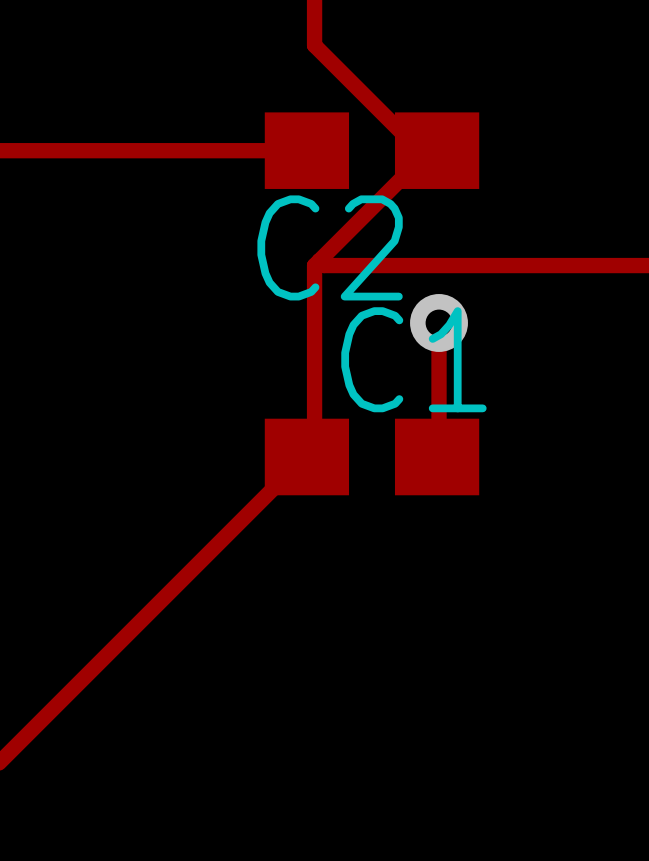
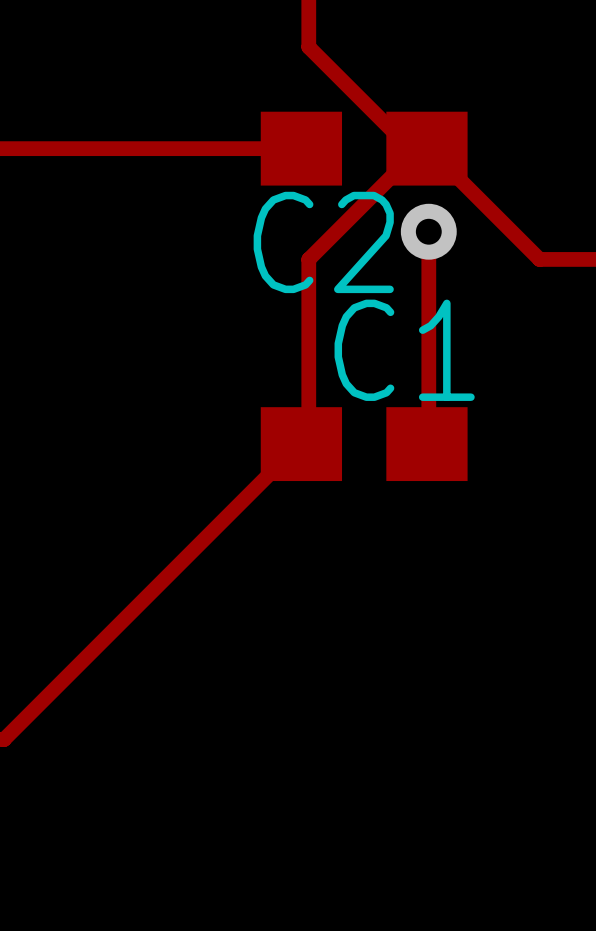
track: none -> (428, 231) (428, 314)
track: (319, 260) (324, 265) (553, 265) -> (426, 148) (539, 259)
via position: (439, 322) -> (428, 231)

